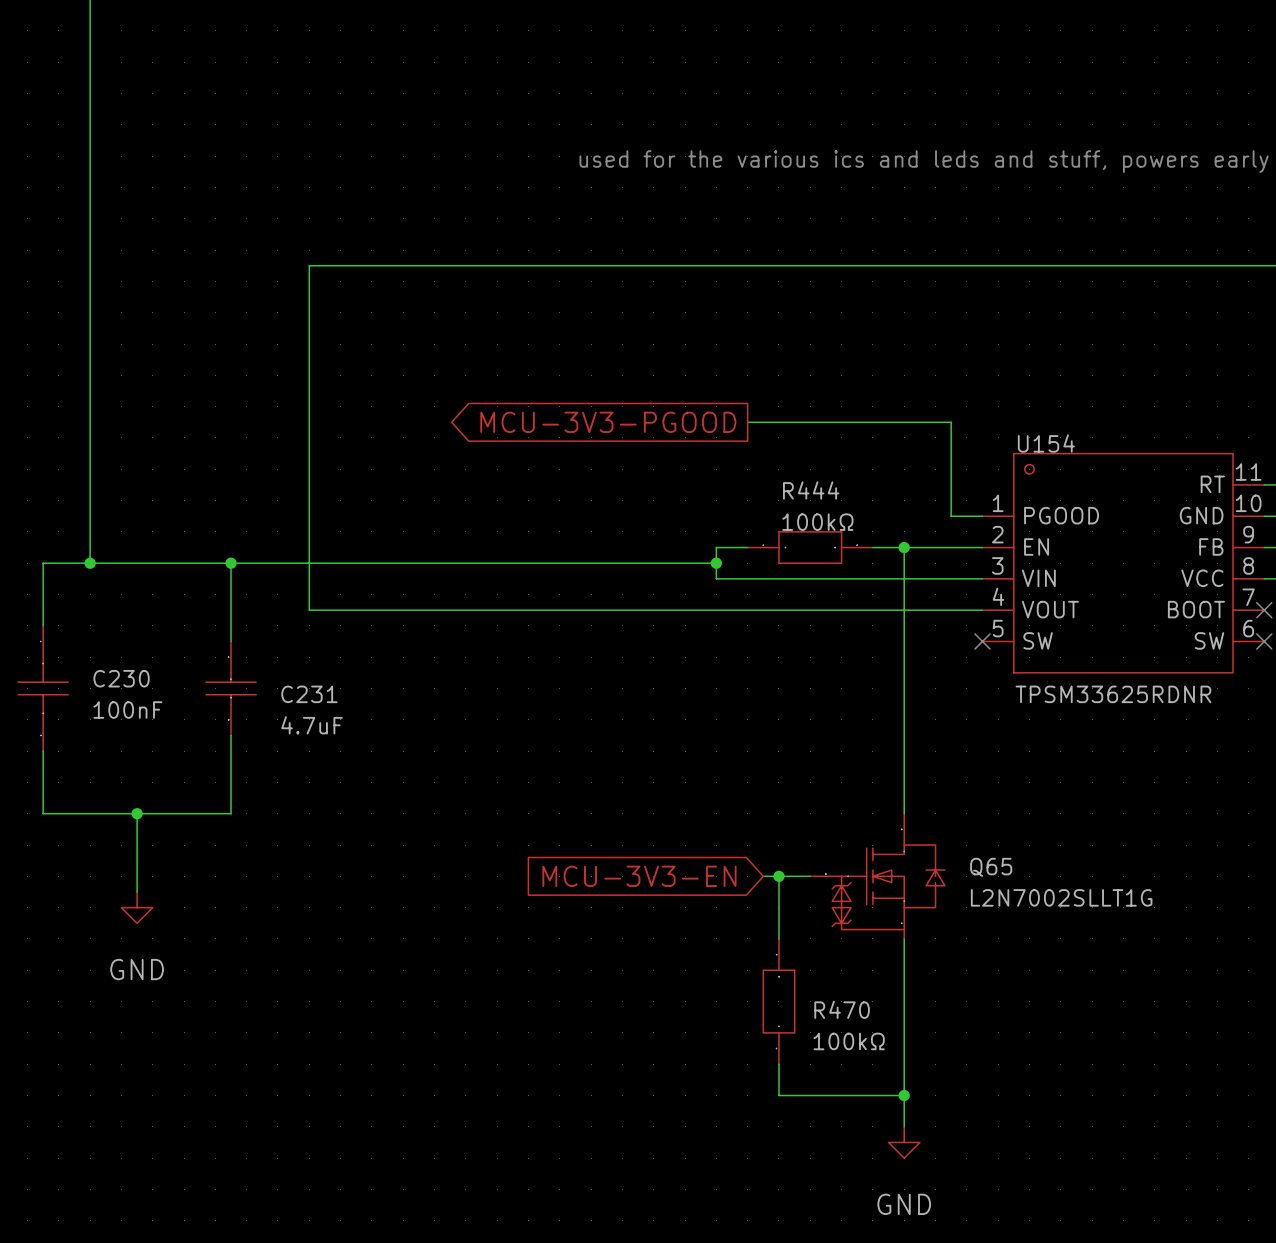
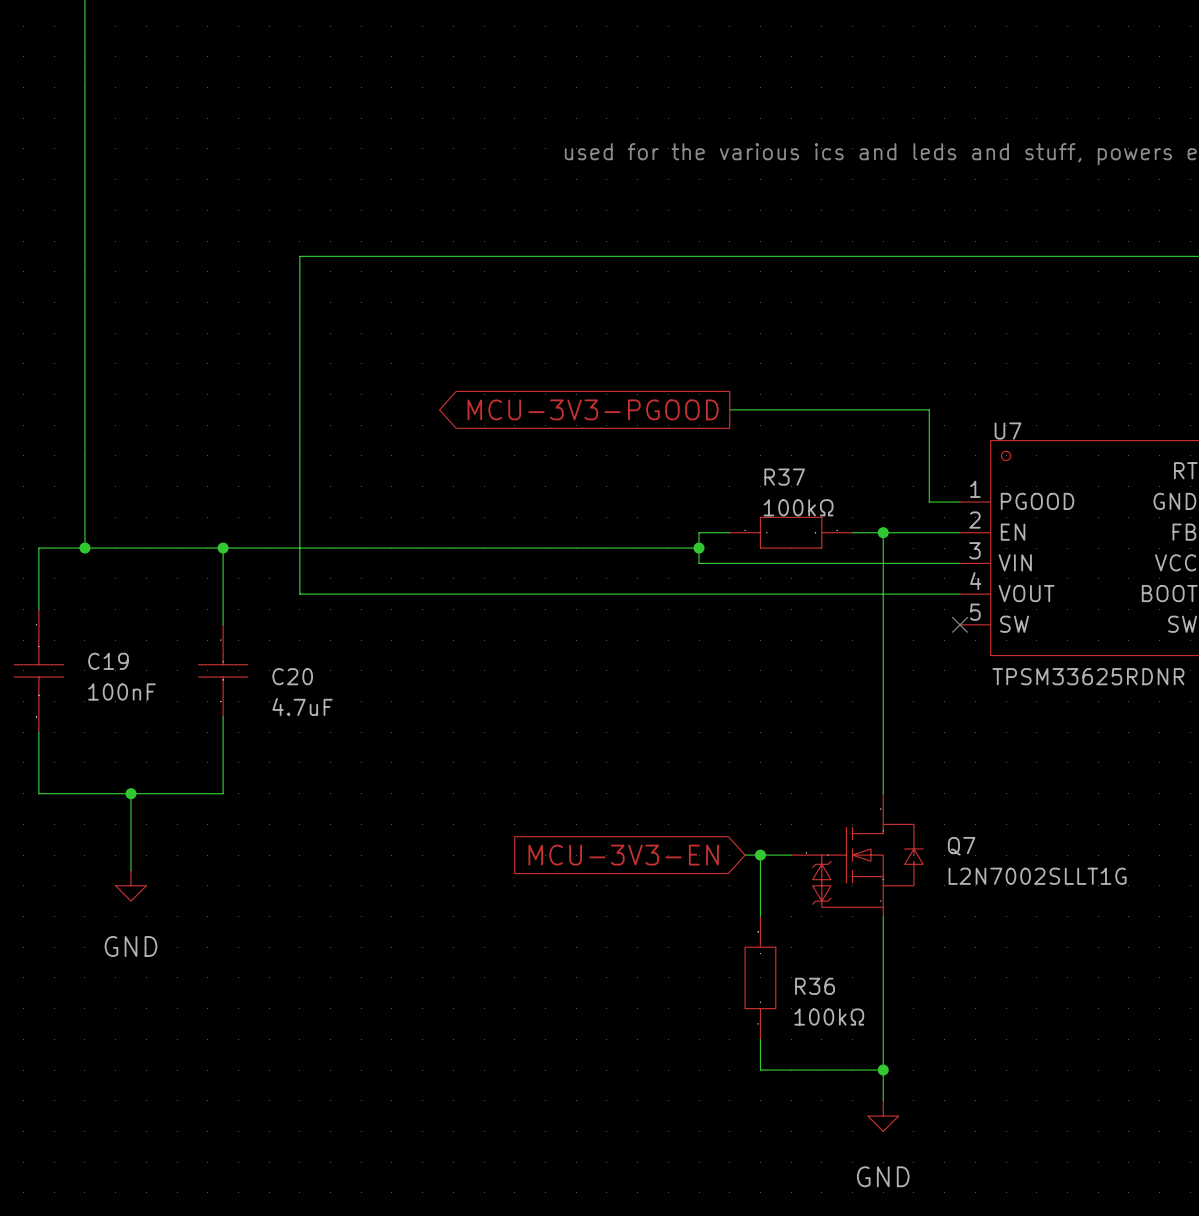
U154 name: U154 (1046, 443) -> U7 (1008, 431)
R444 name: R444 (811, 490) -> R37 (784, 477)
C230 name: C230 (121, 678) -> C19 (108, 661)
C231 name: C231 (309, 694) -> C20 (292, 676)
Q65 name: Q65 (991, 867) -> Q7 (961, 846)
R470 name: R470 (842, 1009) -> R36 (815, 986)

